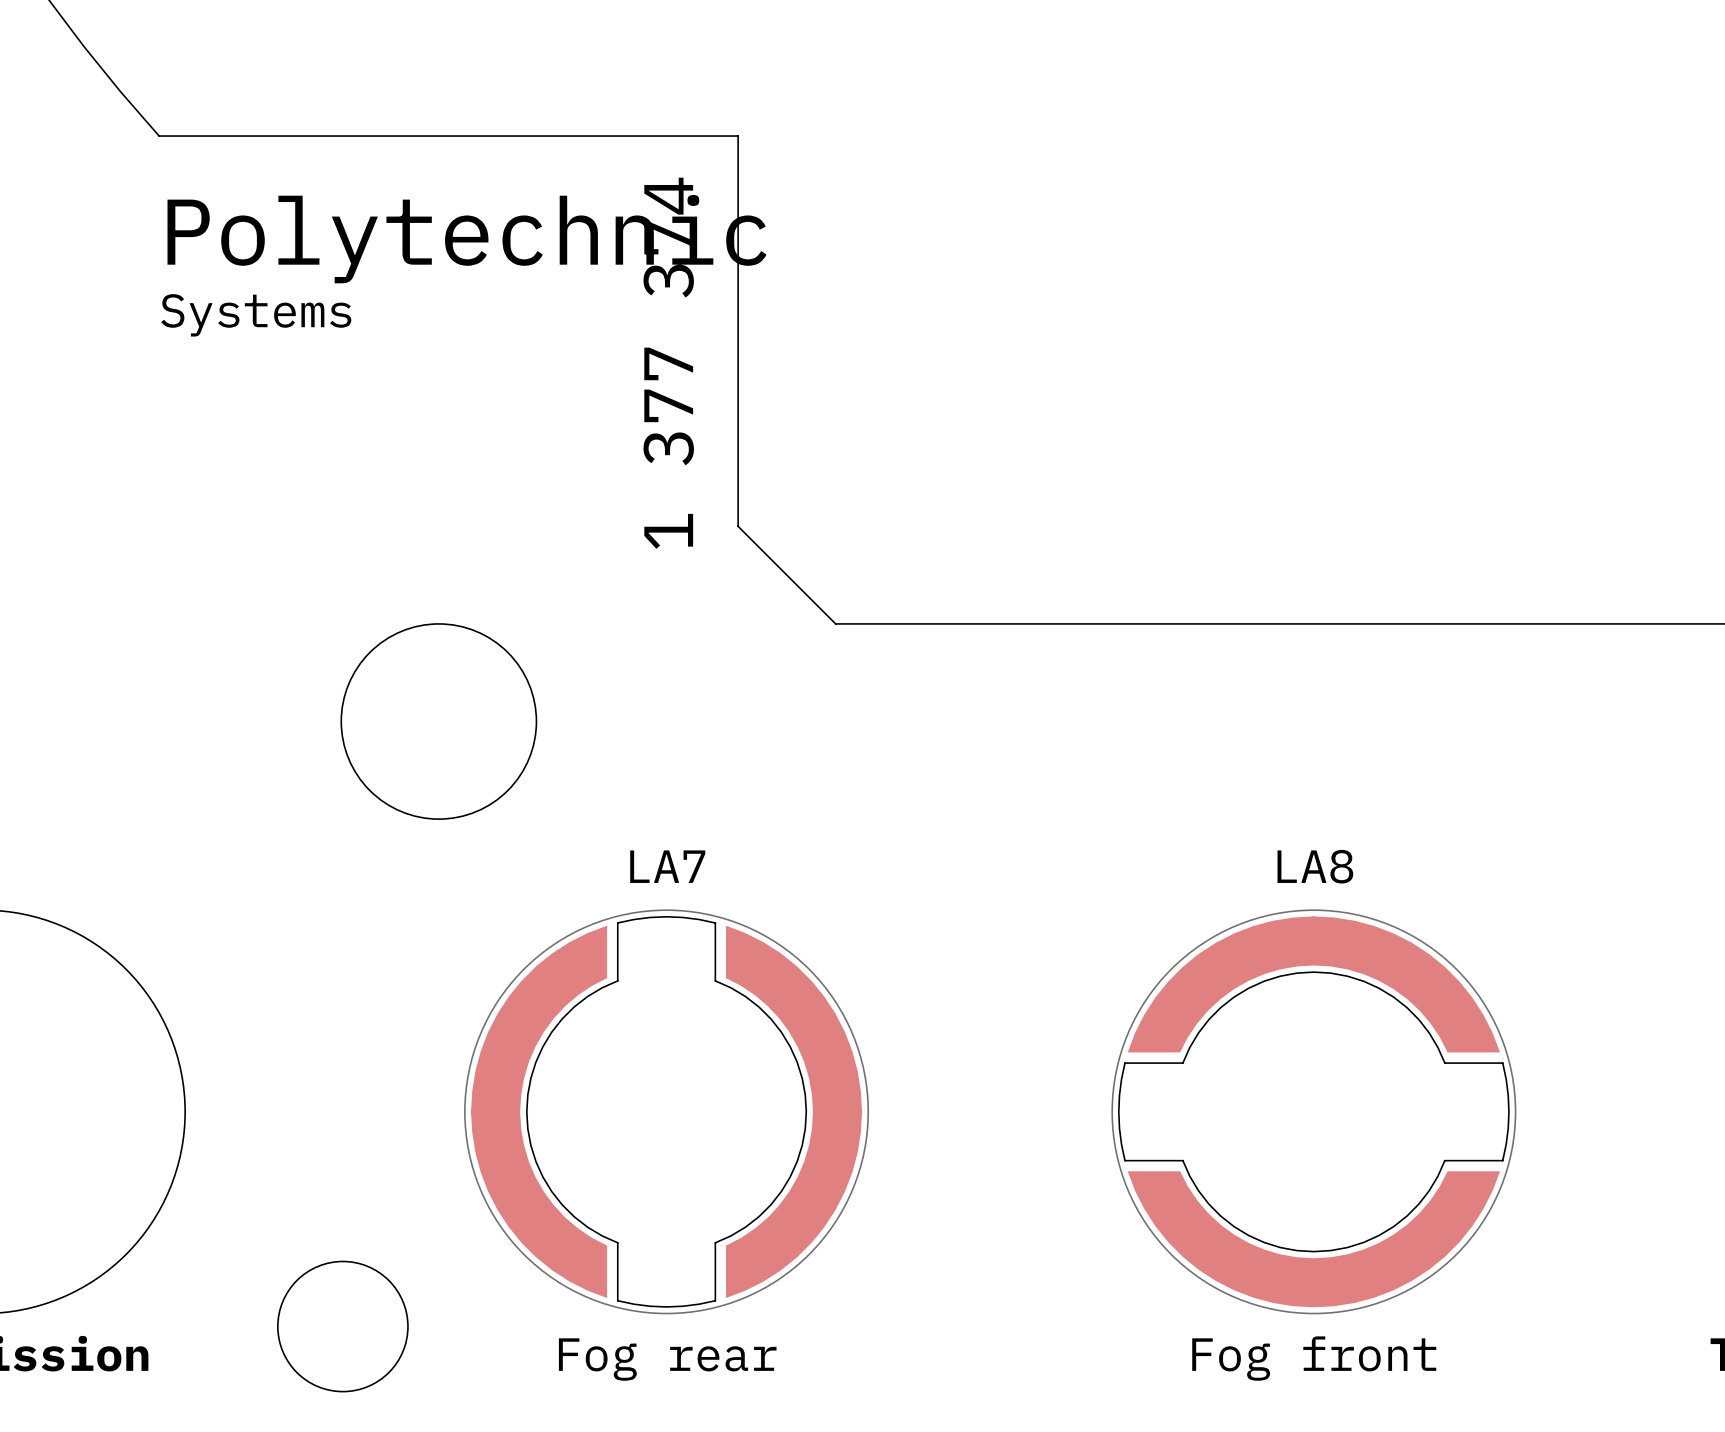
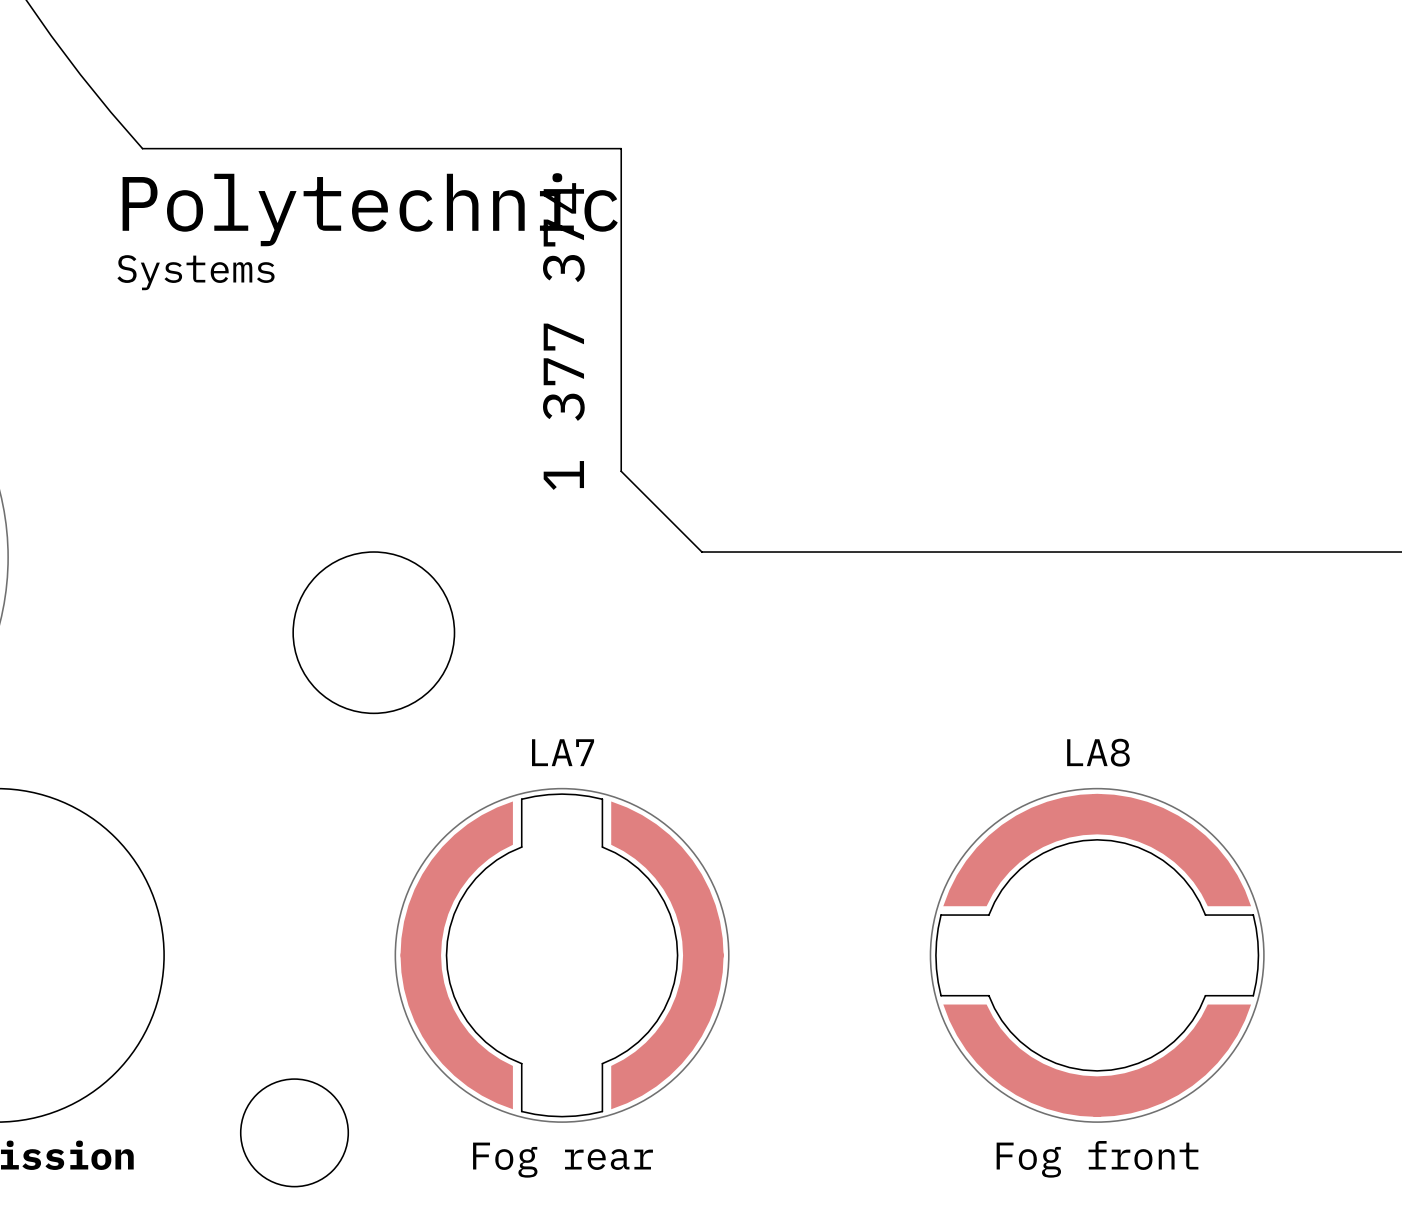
text position: Polytechnic (466, 239) -> Polytechnic (370, 209)
text position: Systems (256, 315) -> Systems (195, 272)

